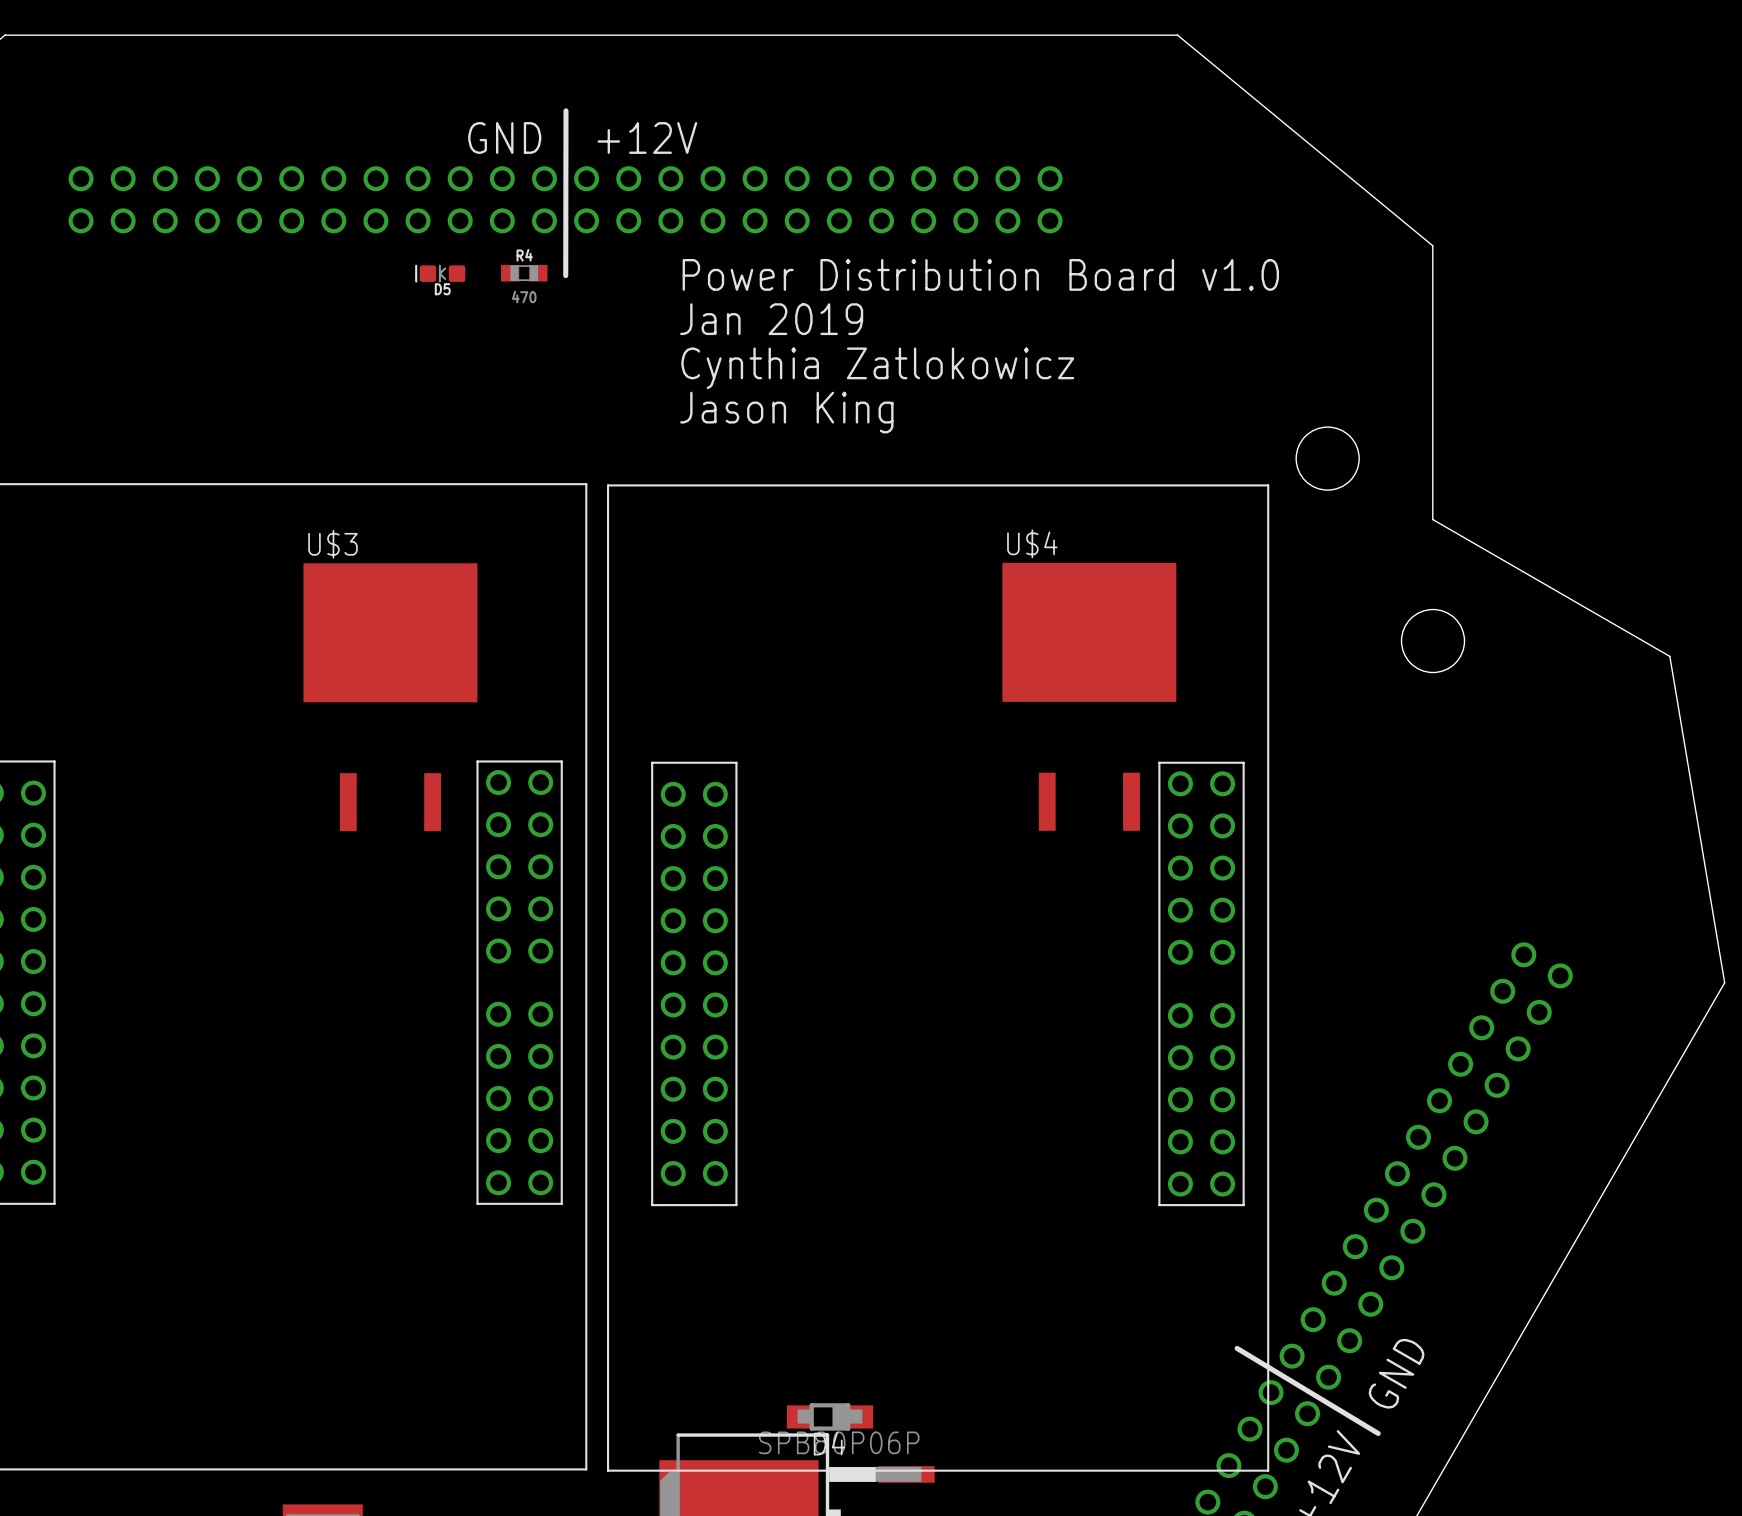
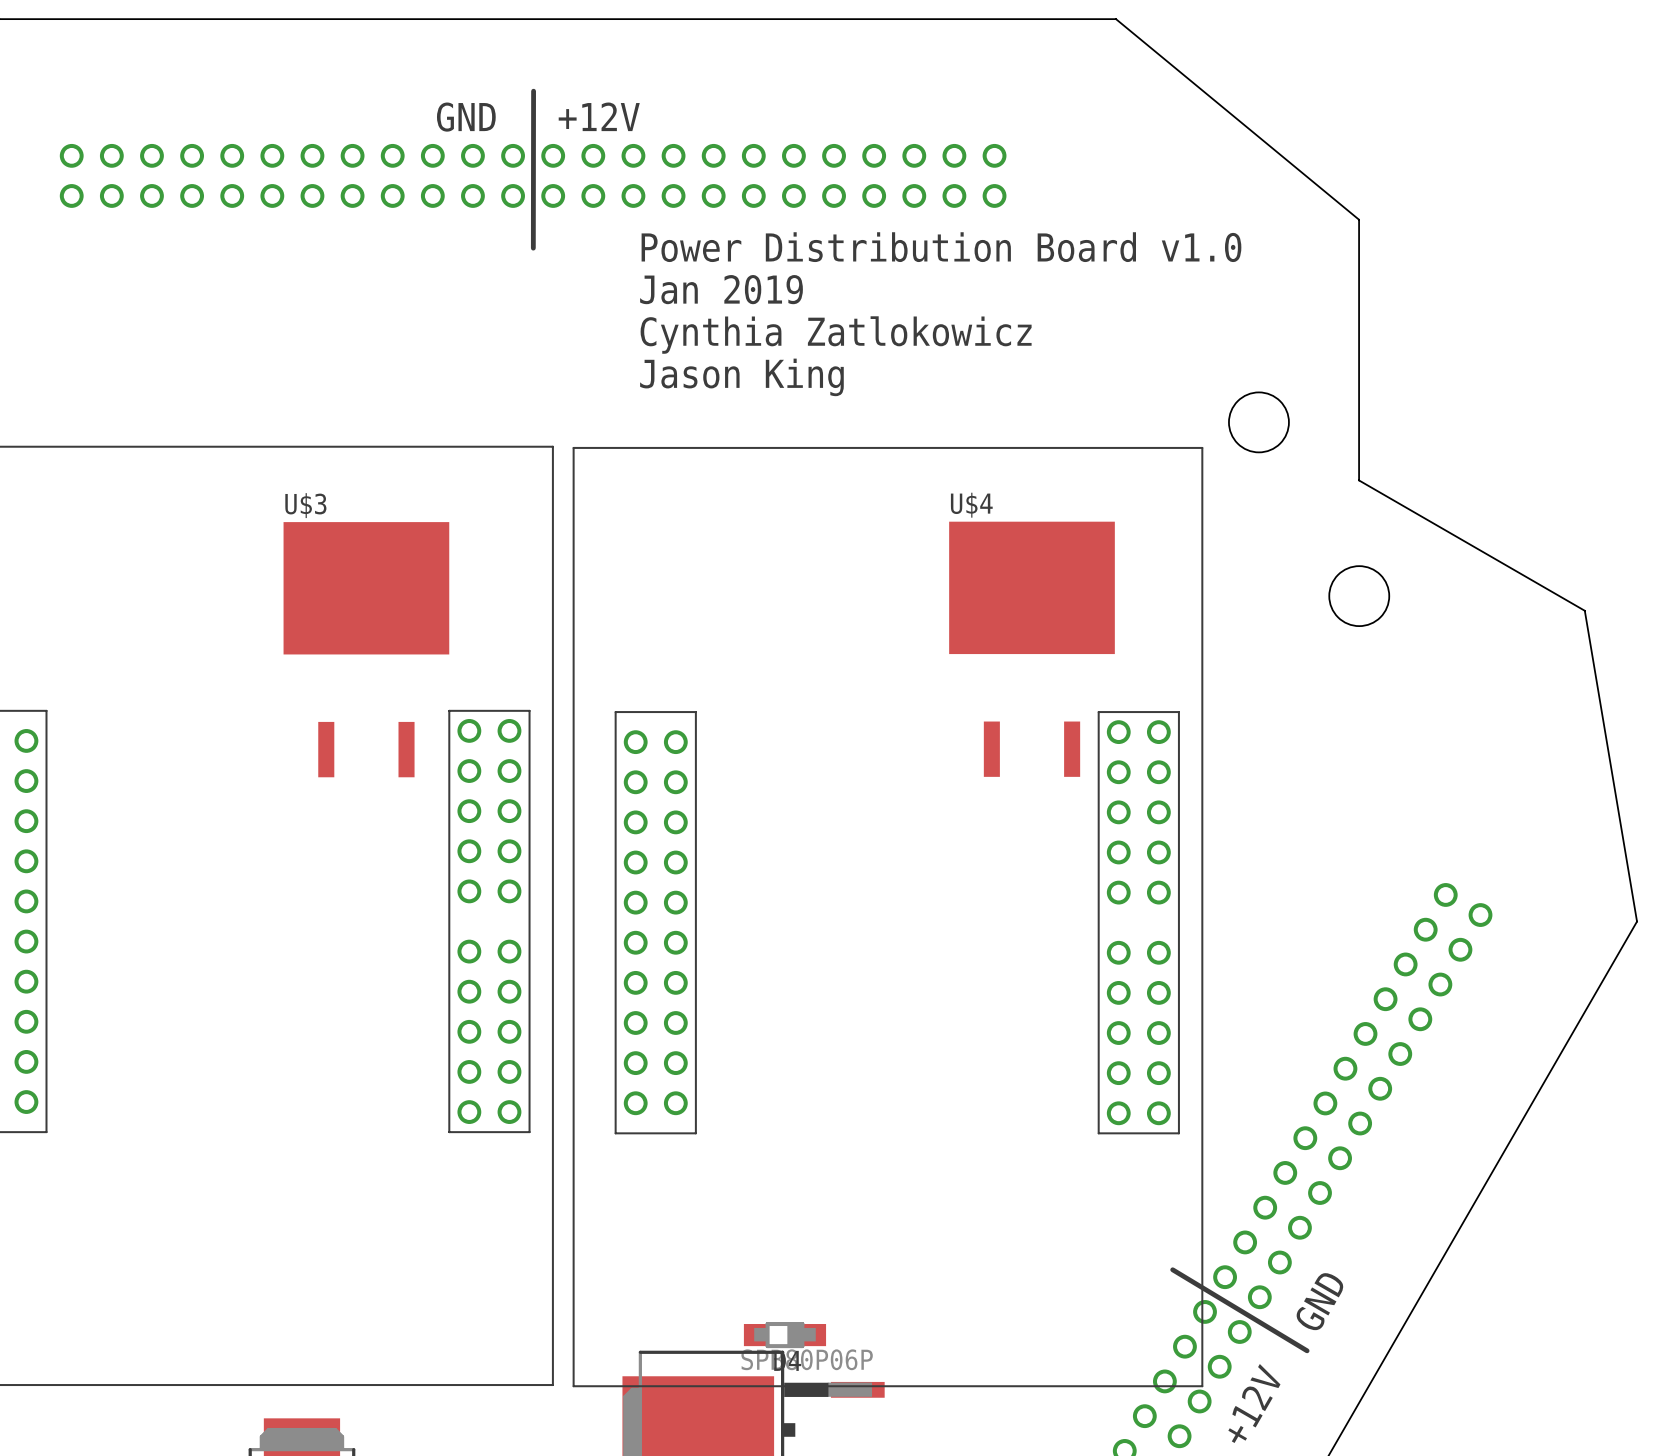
D5: (440, 273) -> none
R4: 470 (524, 273) -> none

